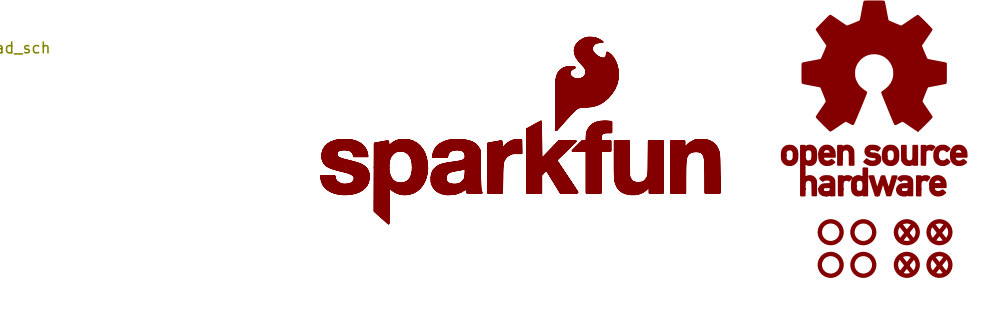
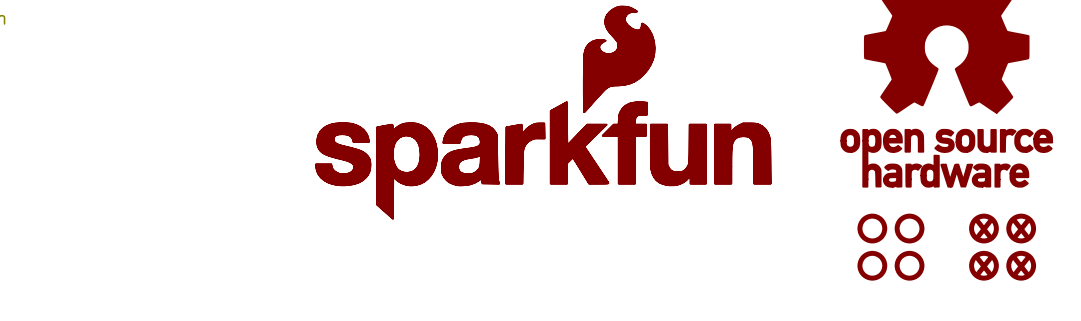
part: none -> (872, 228)
part: (830, 232) -> none
part: none -> (909, 228)
part: (863, 232) -> none
part: none -> (872, 265)
part: (830, 264) -> none
part: none -> (909, 265)
part: (863, 264) -> none

